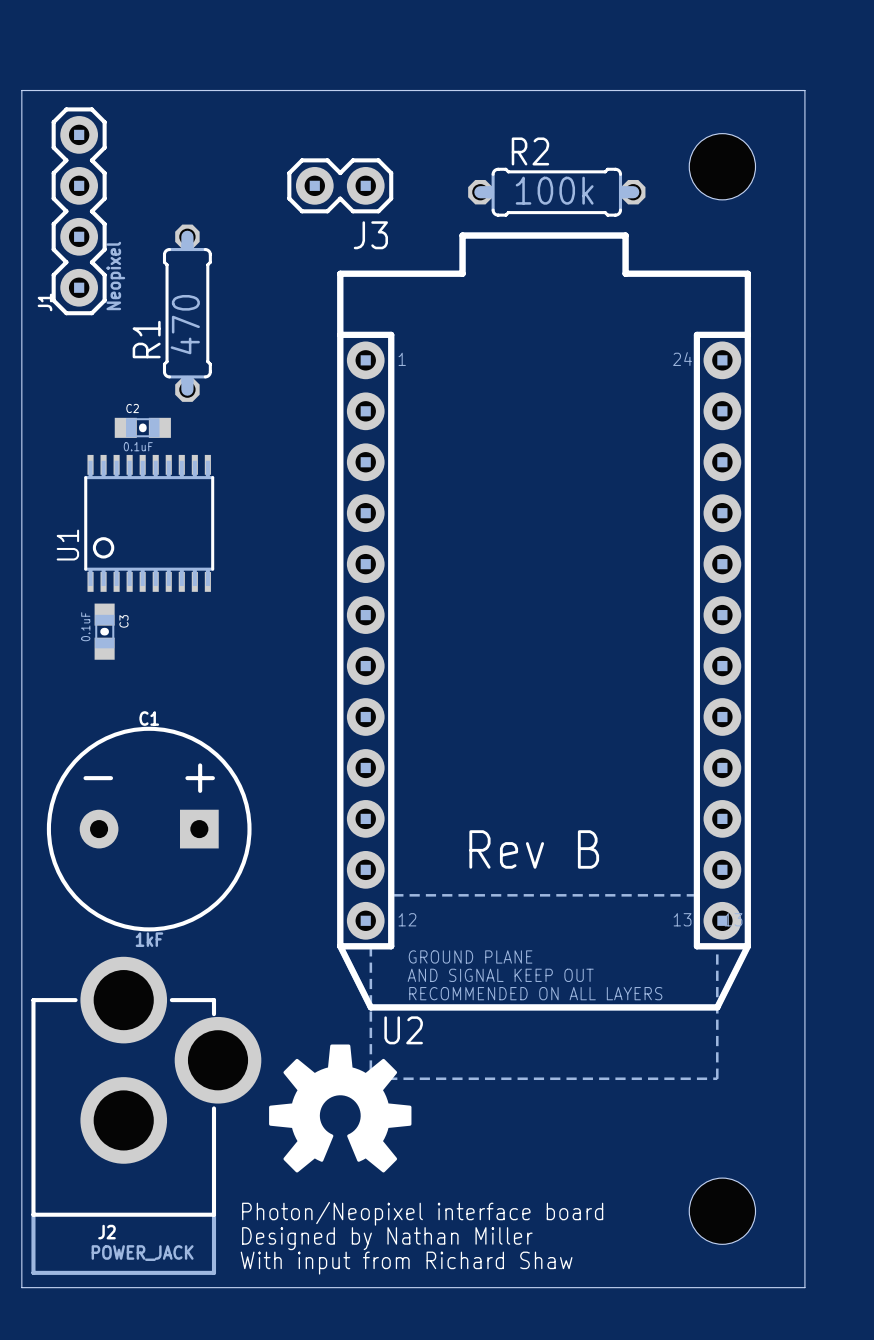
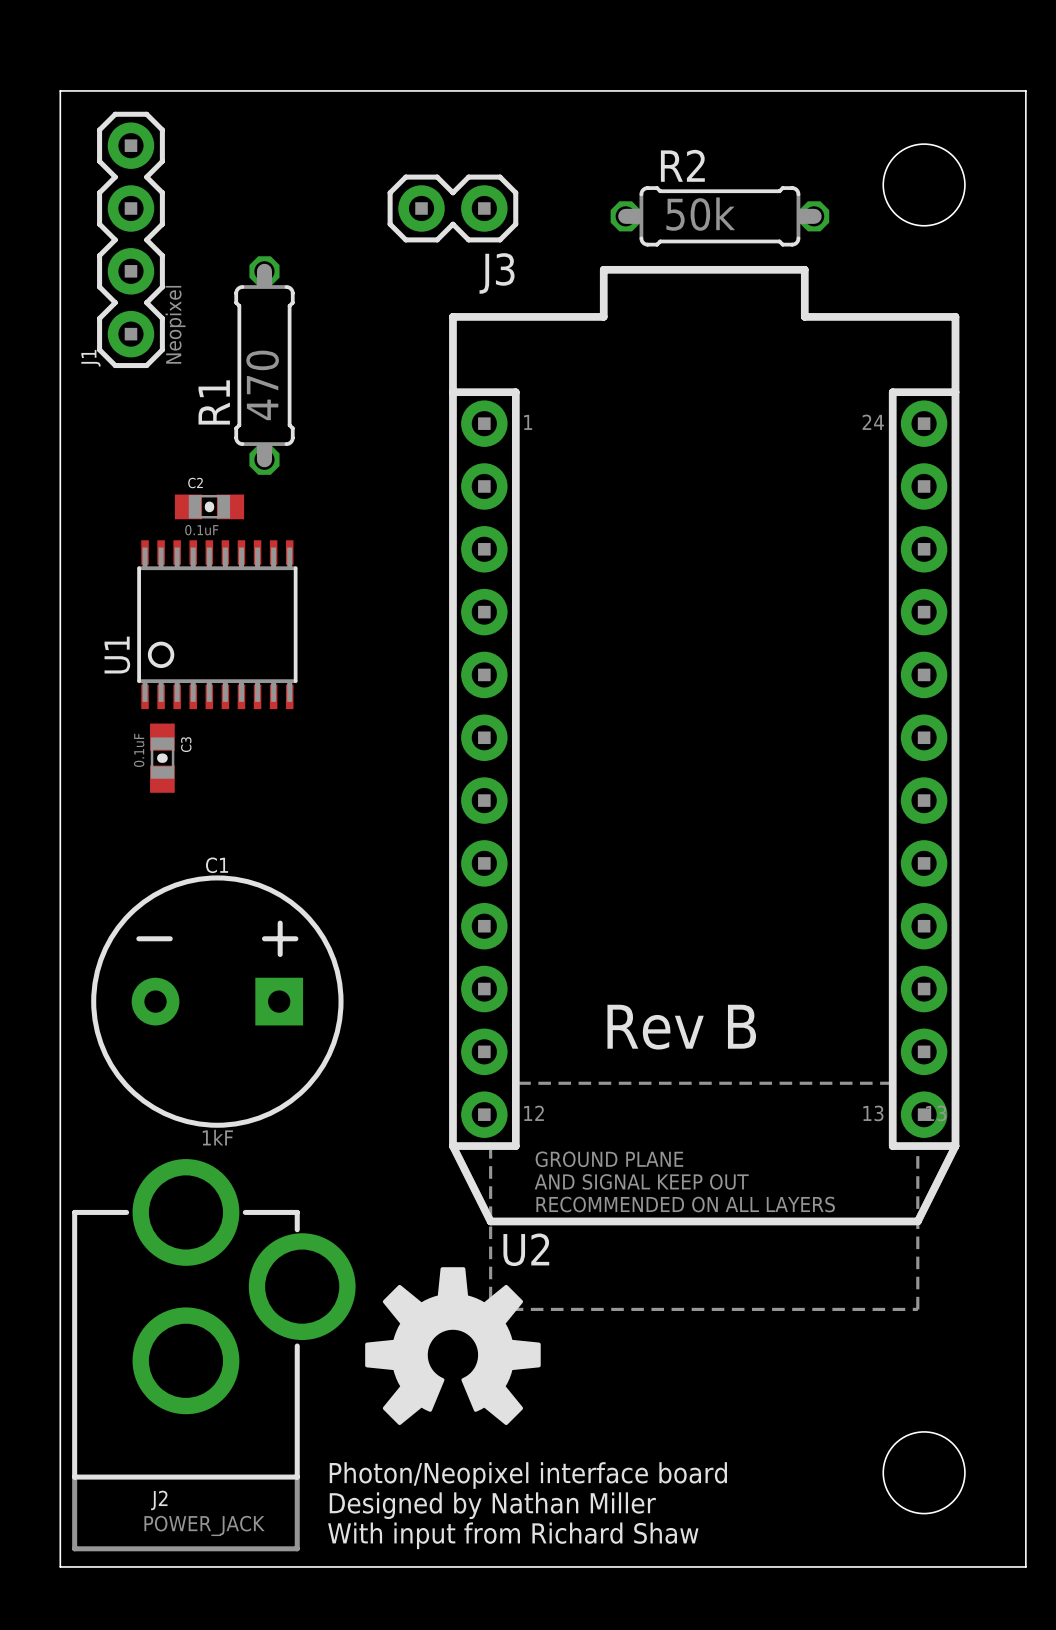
R2 value: 100k (554, 190) -> 50k (700, 214)

